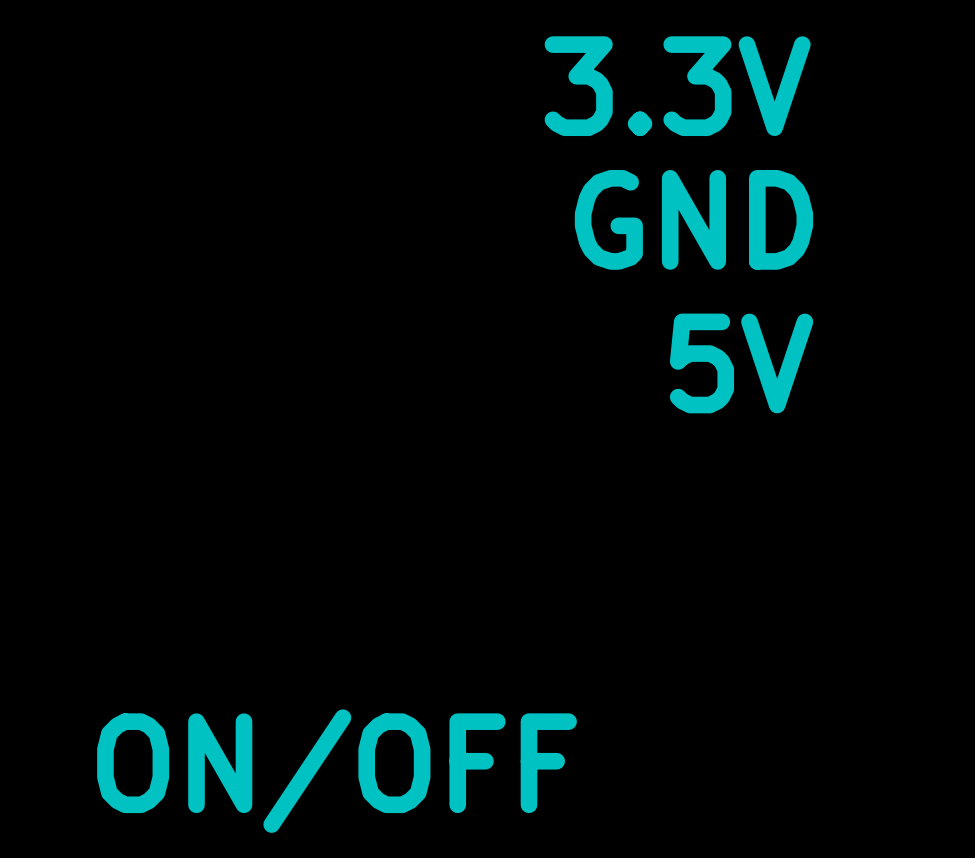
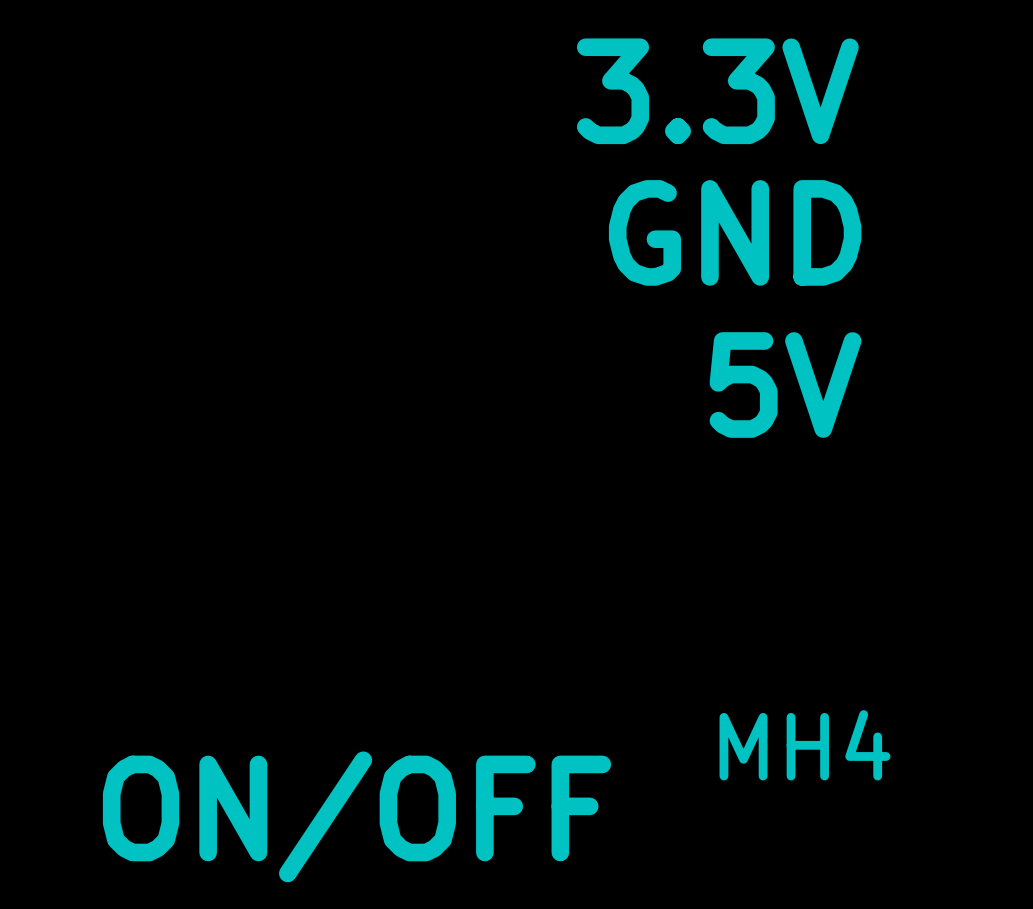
MH4 name: none -> MH4 (805, 745)

